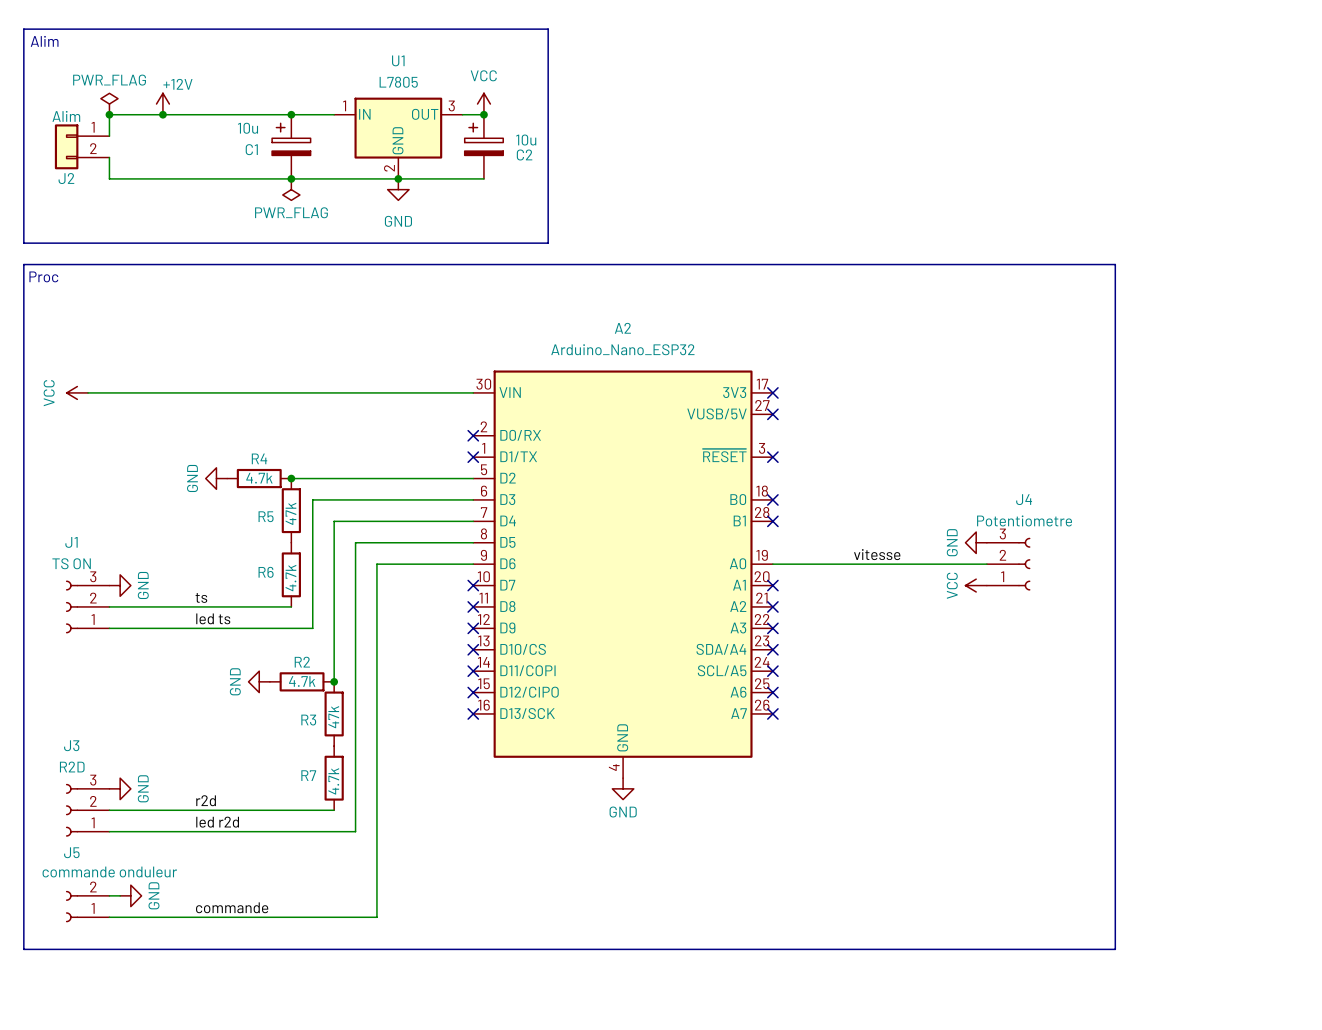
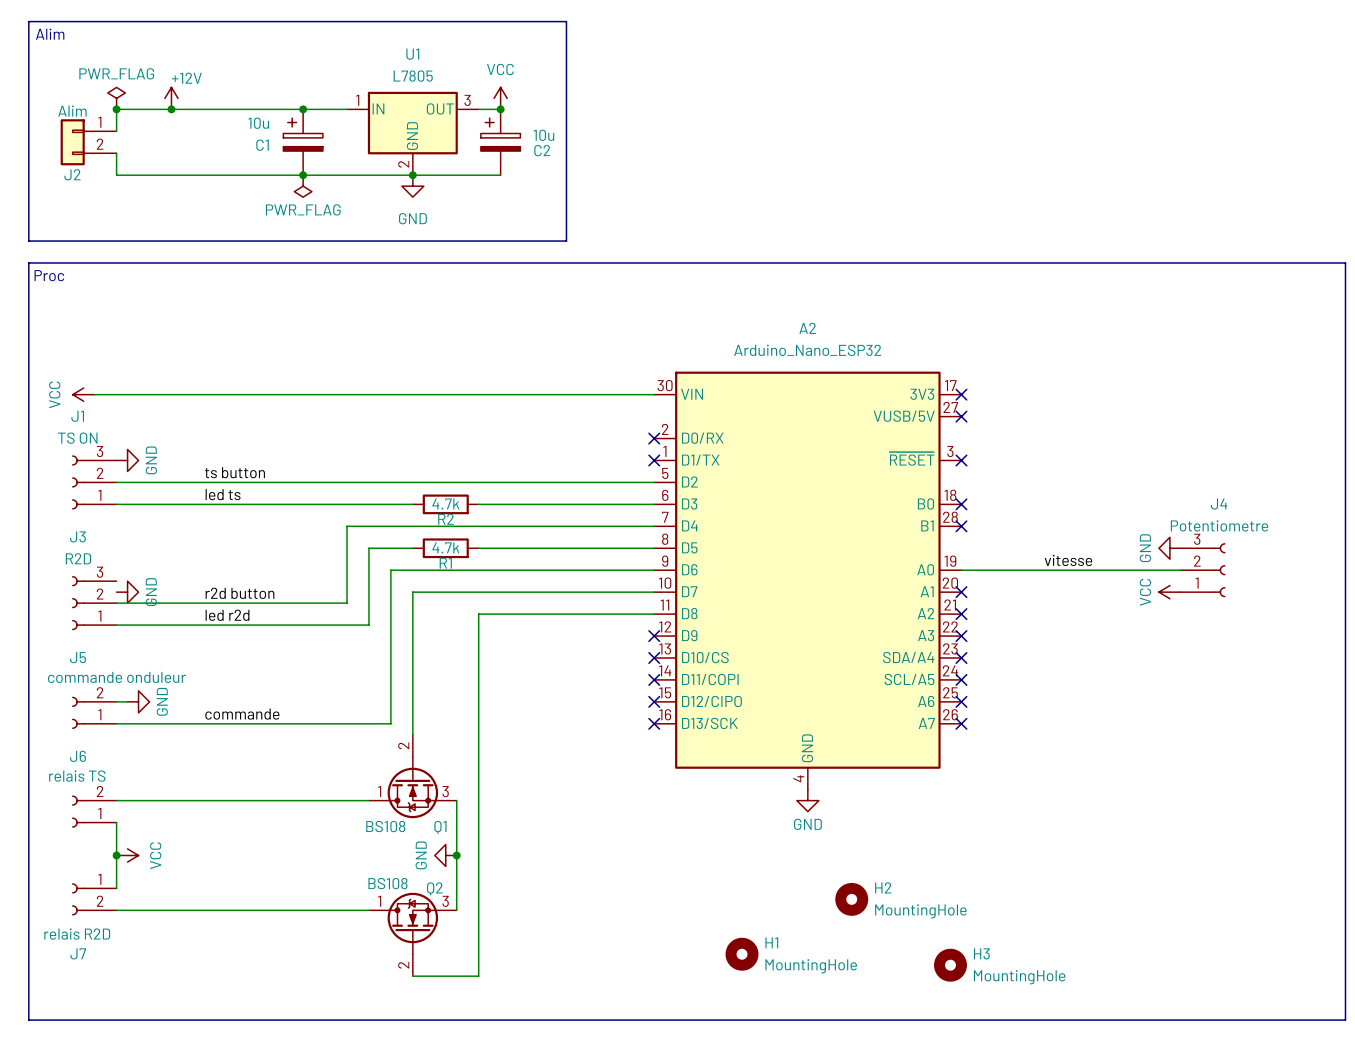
line: (1115, 264) (1115, 949) (23, 949) -> (1147, 262) (1345, 262) (1345, 1020) (28, 1020) (28, 965)
no-connect mark: (772, 392) -> none
no-connect mark: none -> (961, 394)
no-connect mark: (772, 414) -> none
no-connect mark: none -> (961, 416)
no-connect mark: (473, 435) -> none
no-connect mark: none -> (654, 438)
no-connect mark: (473, 457) -> none
no-connect mark: none -> (654, 460)
no-connect mark: (772, 457) -> none
no-connect mark: none -> (961, 460)
label: none -> ts button (234, 472)
power symbol rotation: 0° (216, 478) -> 180° (127, 460)
power symbol position: GND (216, 478) -> GND (127, 460)
R4: 4.7k (259, 478) -> none
junction: (291, 478) -> none
wire: (312, 499) (312, 628) (109, 628) -> (325, 504) (116, 504)
wire: (398, 499) (462, 499) -> none
no-connect mark: (772, 499) -> none
no-connect mark: none -> (961, 504)
R5: 47k (291, 510) -> none
no-connect mark: (772, 521) -> none
no-connect mark: none -> (961, 526)
wire: (398, 542) (462, 542) -> none
R1: none -> 4.7k (445, 548)
power symbol: GND (976, 542) -> none
power symbol: none -> GND (1169, 548)
label position: vitesse (877, 554) -> vitesse (1068, 560)
wire: none -> (1016, 570) (1180, 570)
J4 position: (1008, 564) -> (1203, 570)
R6: 4.7k (291, 574) -> none
A2 position: (623, 574) -> (807, 580)
no-connect mark: (473, 585) -> none
wire: none -> (654, 592) (412, 592) (412, 734)
no-connect mark: (772, 585) -> none
no-connect mark: none -> (961, 592)
power symbol position: VCC (976, 585) -> VCC (1169, 592)
label: none -> r2d button (240, 593)
wire: (334, 596) (334, 681) -> (347, 603) (116, 603)
label: ts (201, 597) -> none
J1 position: (87, 606) -> (94, 482)
wire: (109, 606) (291, 606) -> (116, 482) (303, 482)
no-connect mark: (473, 606) -> none
wire: none -> (654, 614) (478, 614) (478, 976) (412, 976)
no-connect mark: (772, 606) -> none
no-connect mark: none -> (961, 614)
label: none -> led r2d (227, 615)
wire: (355, 617) (355, 831) (109, 831) -> (368, 625) (116, 625)
label position: led ts (213, 618) -> led ts (223, 494)
no-connect mark: (473, 628) -> none
no-connect mark: none -> (654, 636)
no-connect mark: (772, 628) -> none
no-connect mark: none -> (961, 636)
no-connect mark: (473, 649) -> none
no-connect mark: none -> (654, 657)
no-connect mark: (772, 649) -> none
no-connect mark: none -> (961, 657)
R2 name position: R2 (302, 662) -> R2 (446, 519)
no-connect mark: (473, 671) -> none
no-connect mark: none -> (654, 679)
no-connect mark: (772, 671) -> none
no-connect mark: none -> (961, 679)
power symbol: GND (259, 681) -> none
R2 position: (302, 681) -> (445, 504)
junction: (334, 681) -> none
wire: none -> (116, 701) (127, 701)
power symbol: none -> GND (138, 701)
no-connect mark: (473, 692) -> none
no-connect mark: none -> (654, 701)
no-connect mark: (772, 692) -> none
no-connect mark: none -> (961, 701)
R3: 47k (334, 713) -> none
wire: (376, 713) (376, 917) (109, 917) -> (390, 723) (116, 723)
no-connect mark: (473, 713) -> none
no-connect mark: none -> (654, 723)
no-connect mark: (772, 713) -> none
no-connect mark: none -> (961, 723)
Q1: none -> BS108 (412, 776)
R7: 4.7k (334, 778) -> none
wire: none -> (116, 800) (368, 800)
power symbol: GND (120, 788) -> none
wire: none -> (456, 800) (456, 910)
power symbol: GND (623, 788) -> none
power symbol: none -> GND (807, 800)
J6: none -> relais TS (94, 811)
label: r2d (206, 800) -> none
J3 position: (87, 810) -> (94, 603)
wire: (109, 810) (334, 810) -> (116, 822) (116, 888)
label: led r2d (217, 822) -> none
junction: none -> (116, 855)
power symbol: none -> VCC (127, 855)
power symbol: none -> GND (445, 855)
junction: none -> (456, 855)
J7: none -> relais R2D (94, 899)
H2: none -> MountingHole (851, 899)
wire: none -> (127, 910) (368, 910)
power symbol: GND (130, 895) -> none
J5 position: (87, 906) -> (94, 712)
label position: commande (232, 907) -> commande (242, 714)
Q2: none -> BS108 (412, 934)
H1: none -> MountingHole (742, 954)
H3: none -> MountingHole (950, 965)

